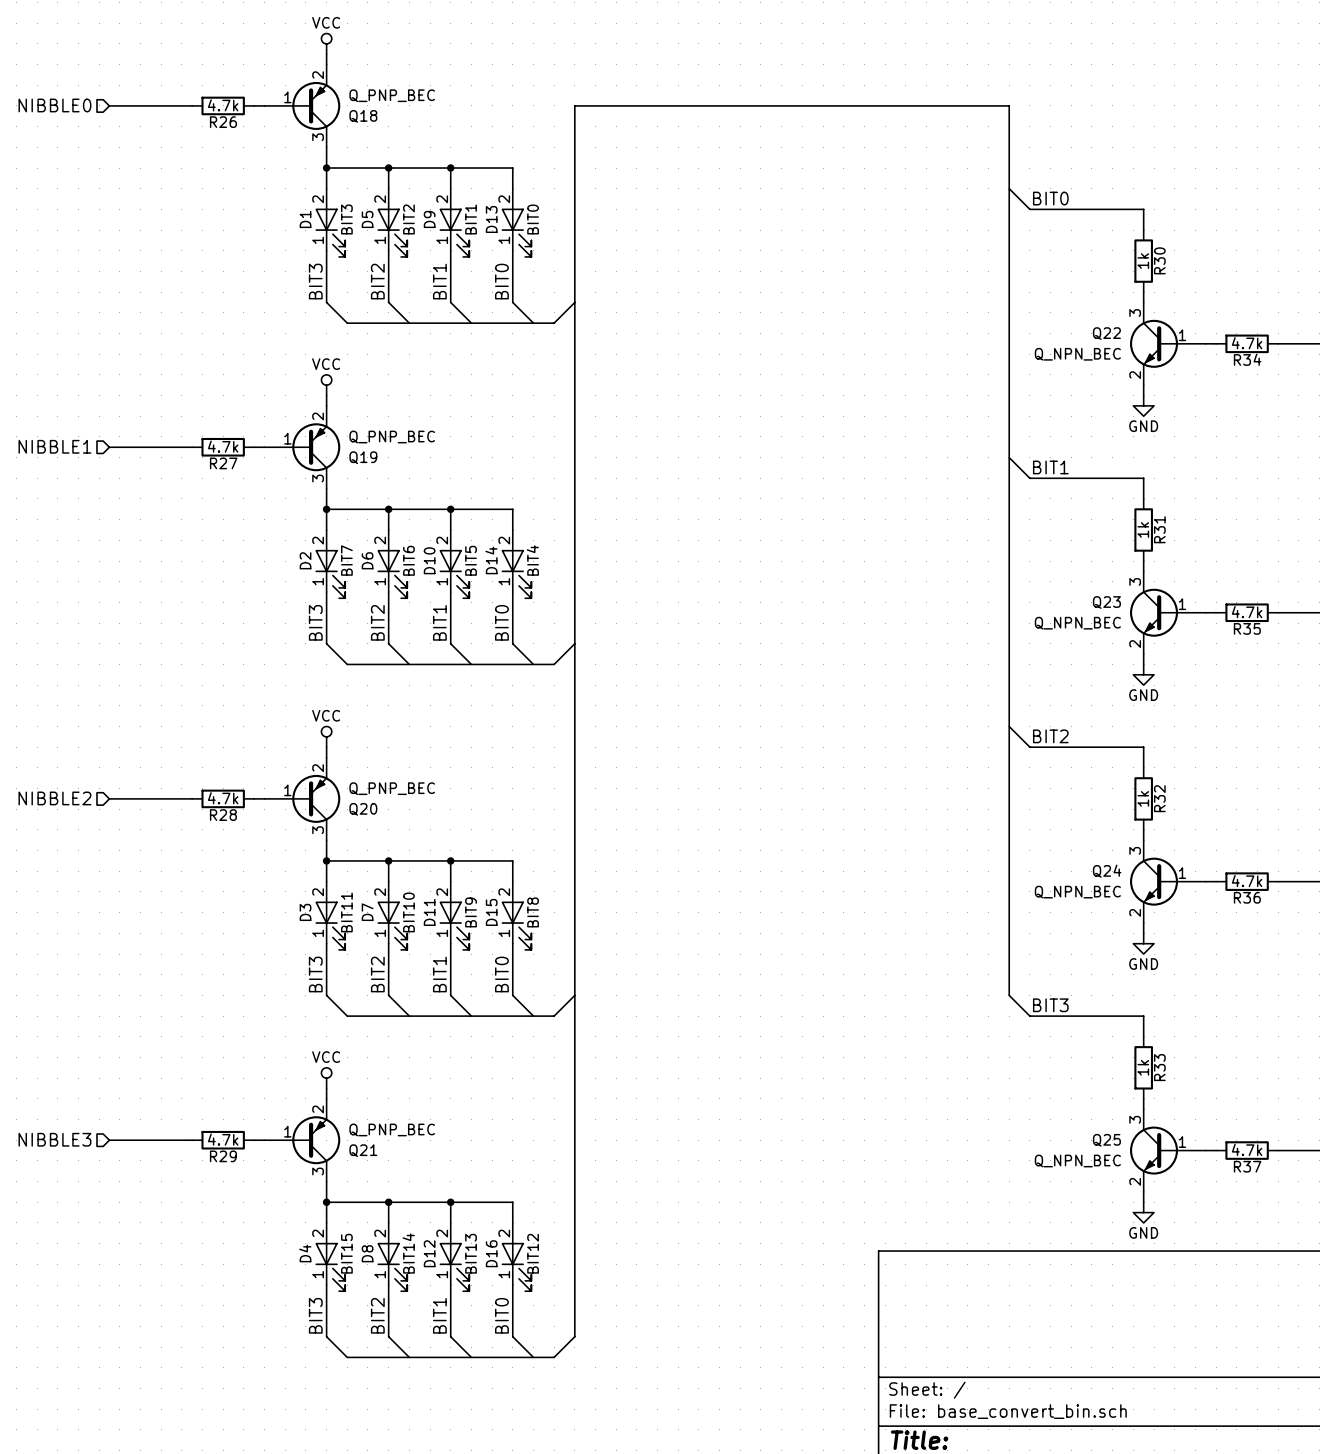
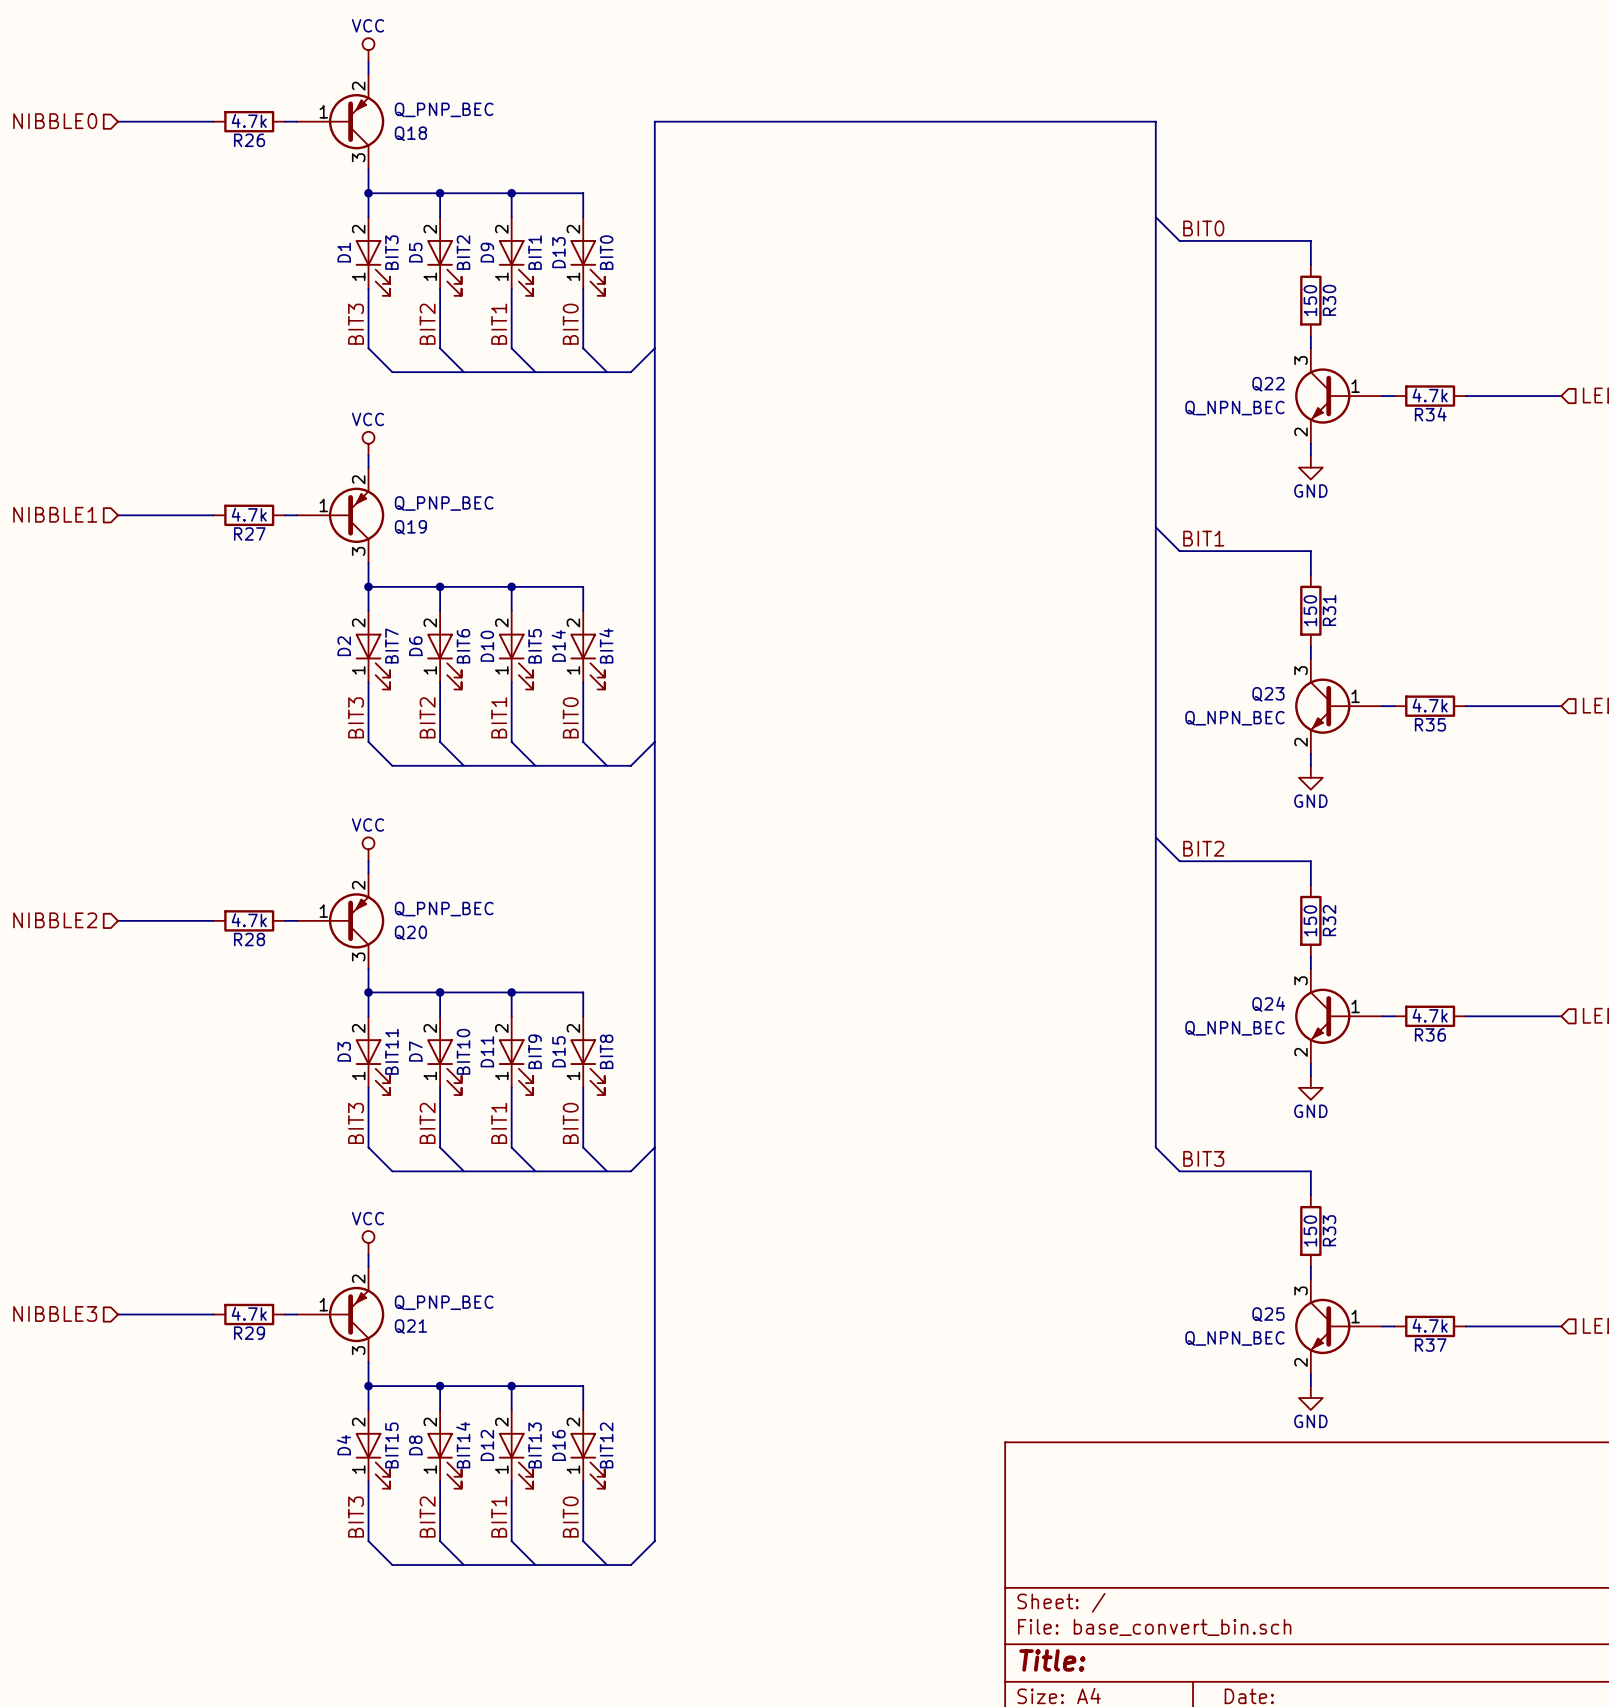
R30 value: 1k (1143, 261) -> 150 (1310, 300)
R31 value: 1k (1143, 530) -> 150 (1310, 610)
R32 value: 1k (1143, 798) -> 150 (1310, 920)
R33 value: 1k (1143, 1067) -> 150 (1310, 1231)

